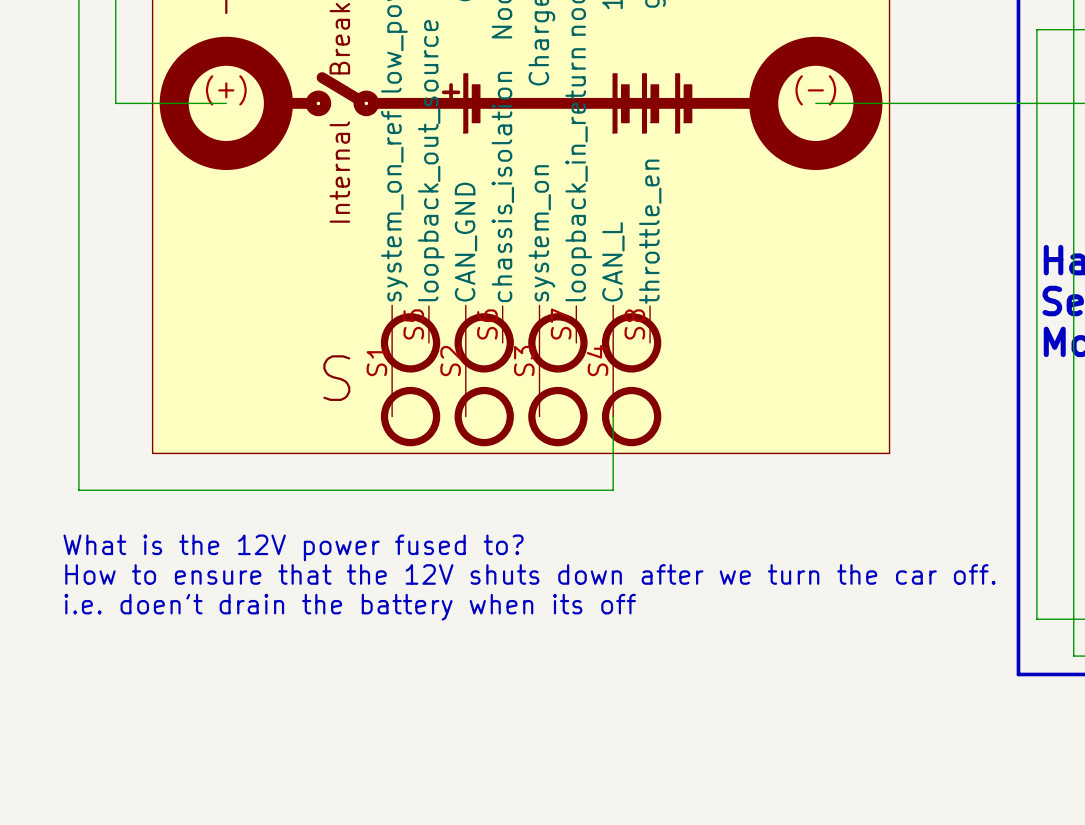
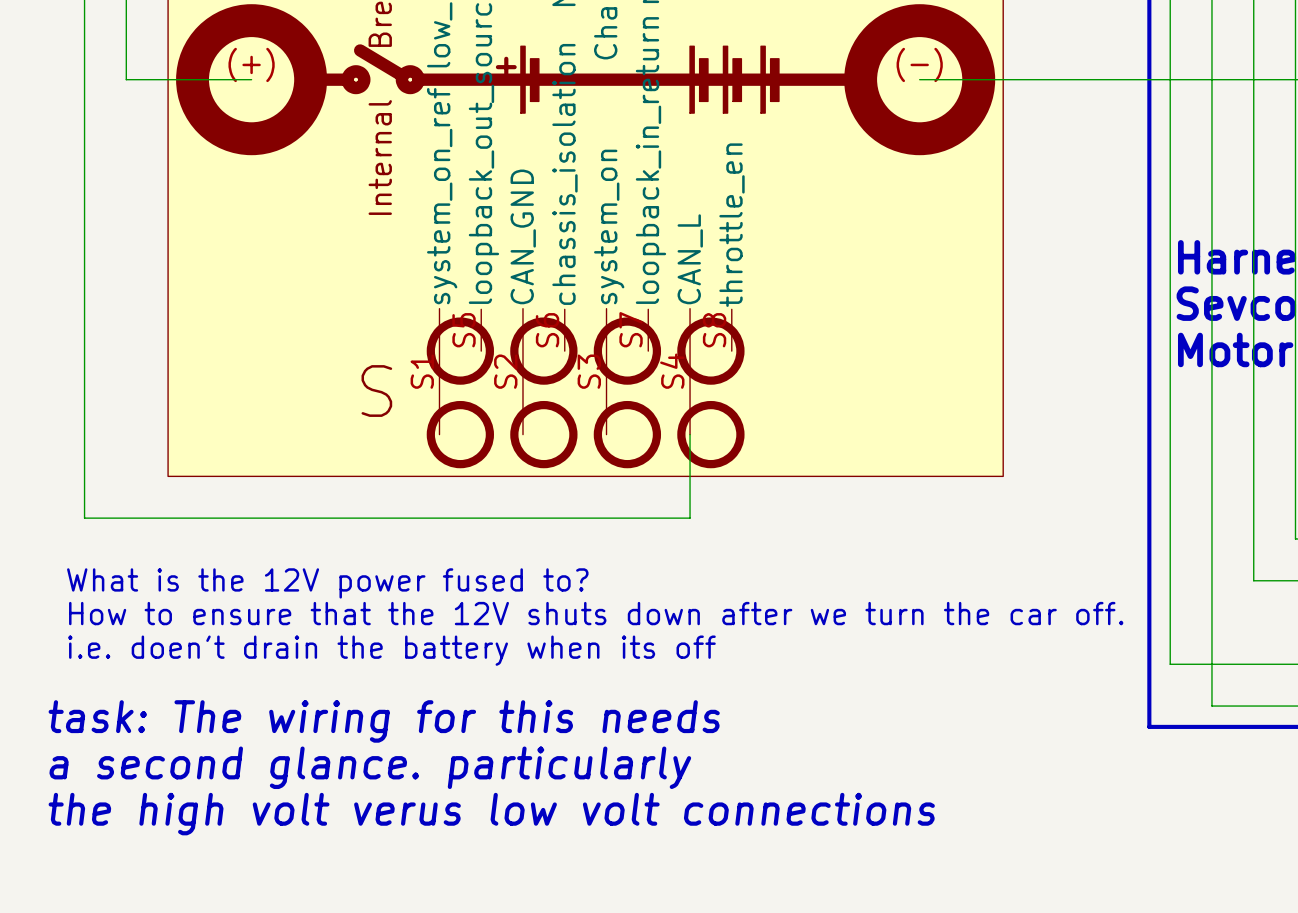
text: none -> task: The wiring for this needs (384, 721)
text: none -> a second glance. particularly (370, 767)
text: none -> the high volt verus low volt connections (491, 814)

